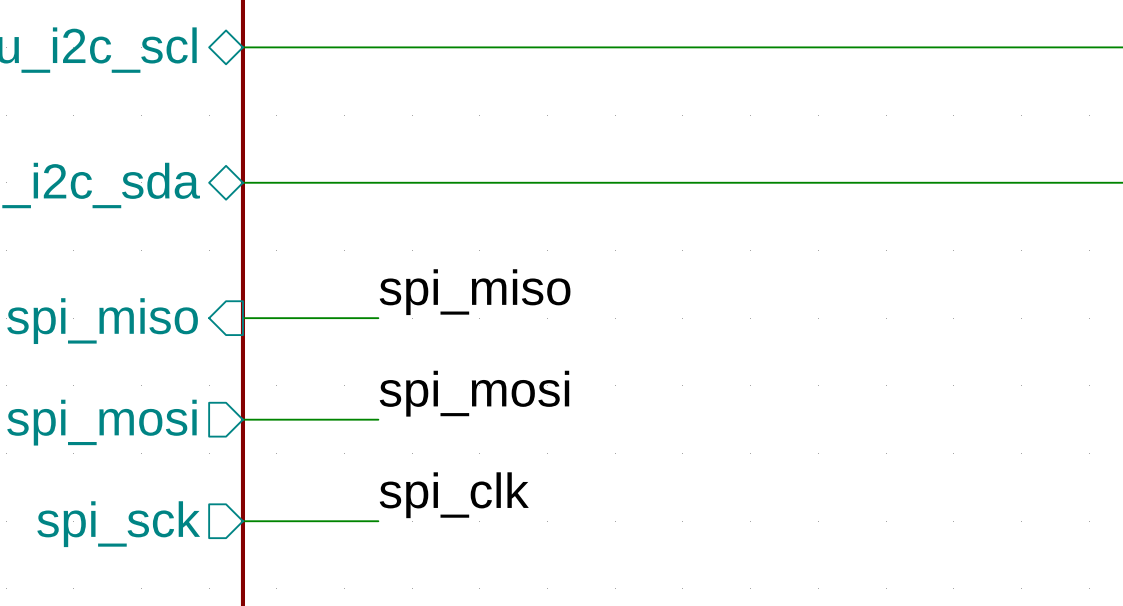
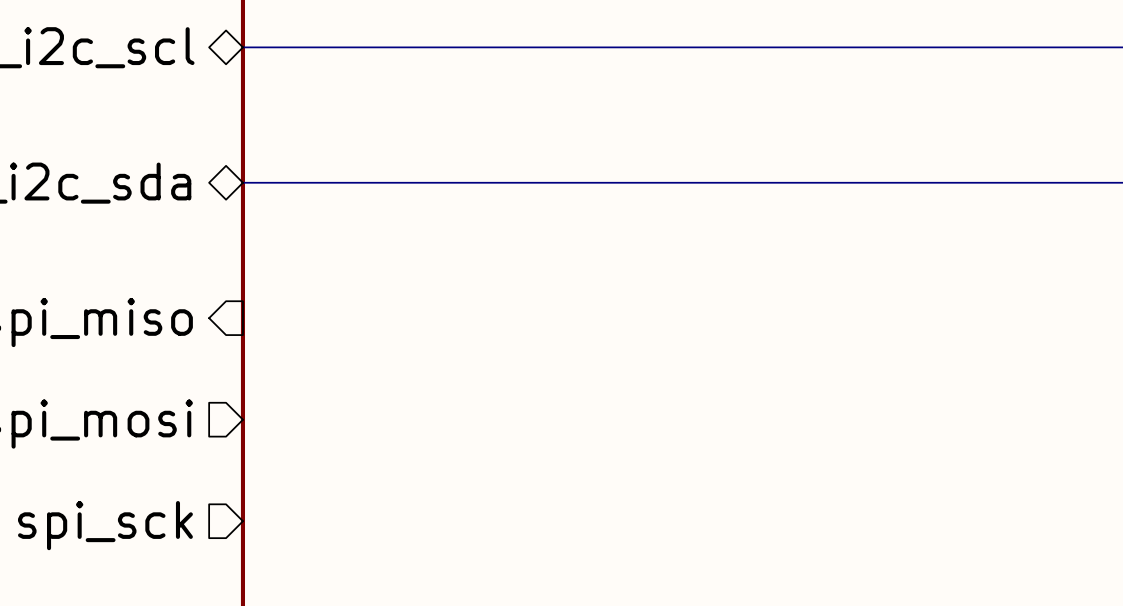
label: spi_miso (475, 292) -> none
wire: (242, 318) (378, 318) -> none
label: spi_mosi (474, 393) -> none
wire: (242, 419) (378, 419) -> none
label: spi_clk (454, 495) -> none
wire: (242, 521) (378, 521) -> none

